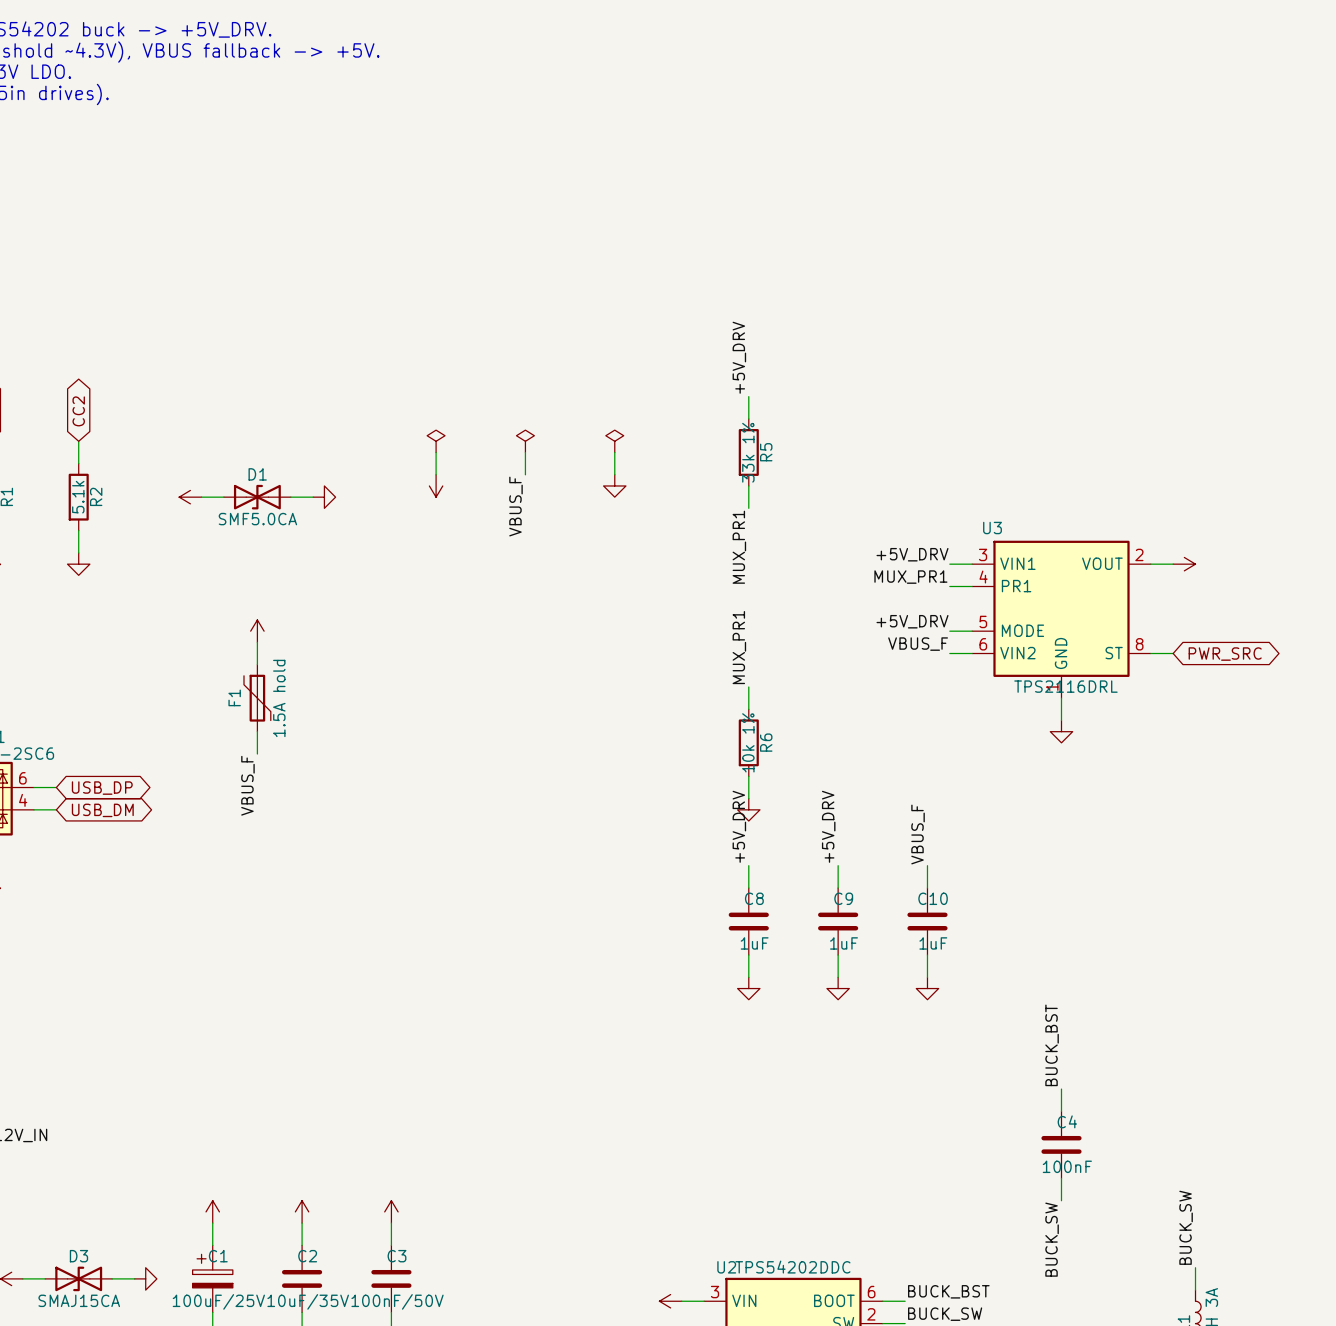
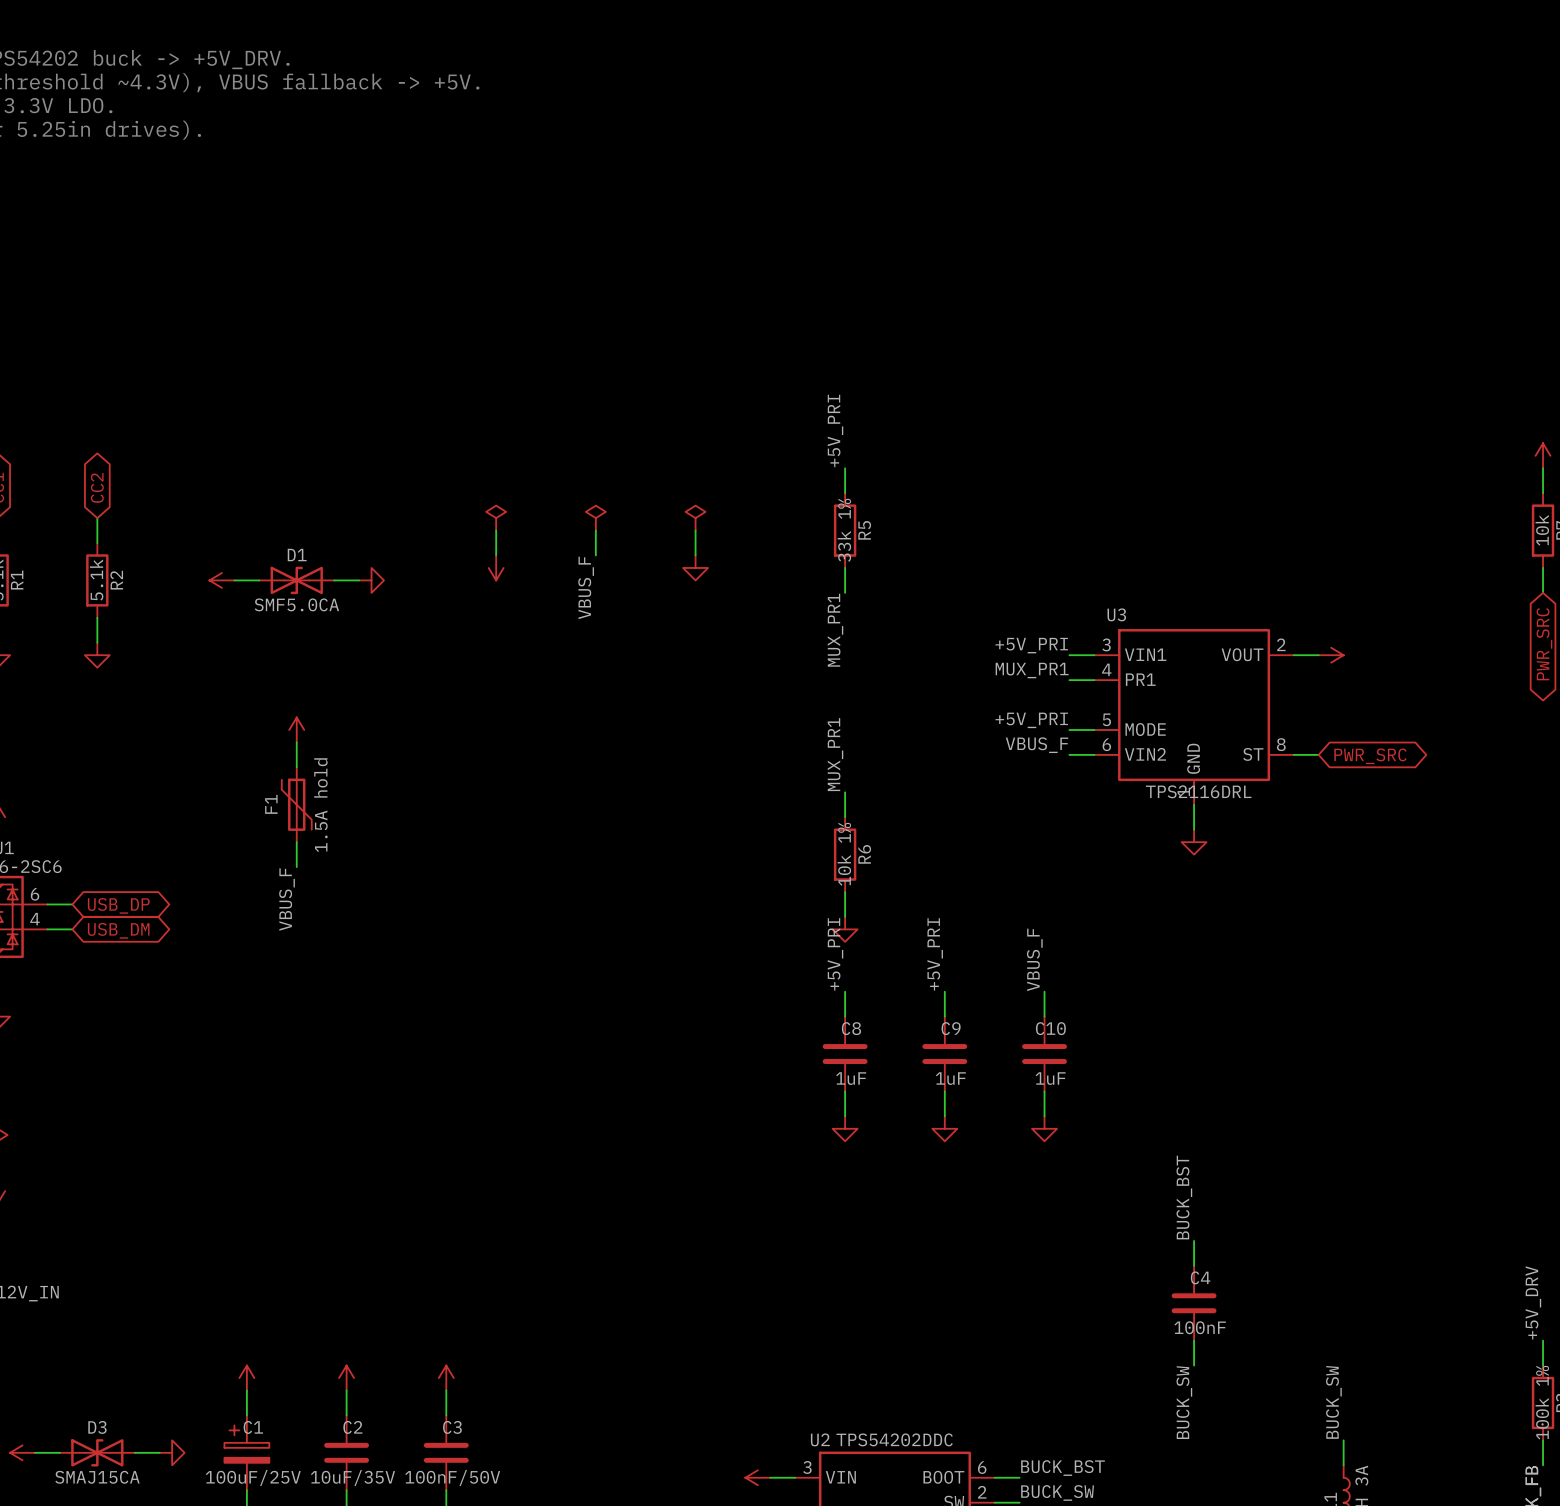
label: +5V_DRV (739, 357) -> +5V_PRI (835, 430)
label: +5V_DRV (912, 554) -> +5V_PRI (1031, 645)
label: +5V_DRV (912, 621) -> +5V_PRI (1031, 720)
label: +5V_DRV (739, 826) -> +5V_PRI (835, 954)
label: +5V_DRV (828, 826) -> +5V_PRI (935, 954)

